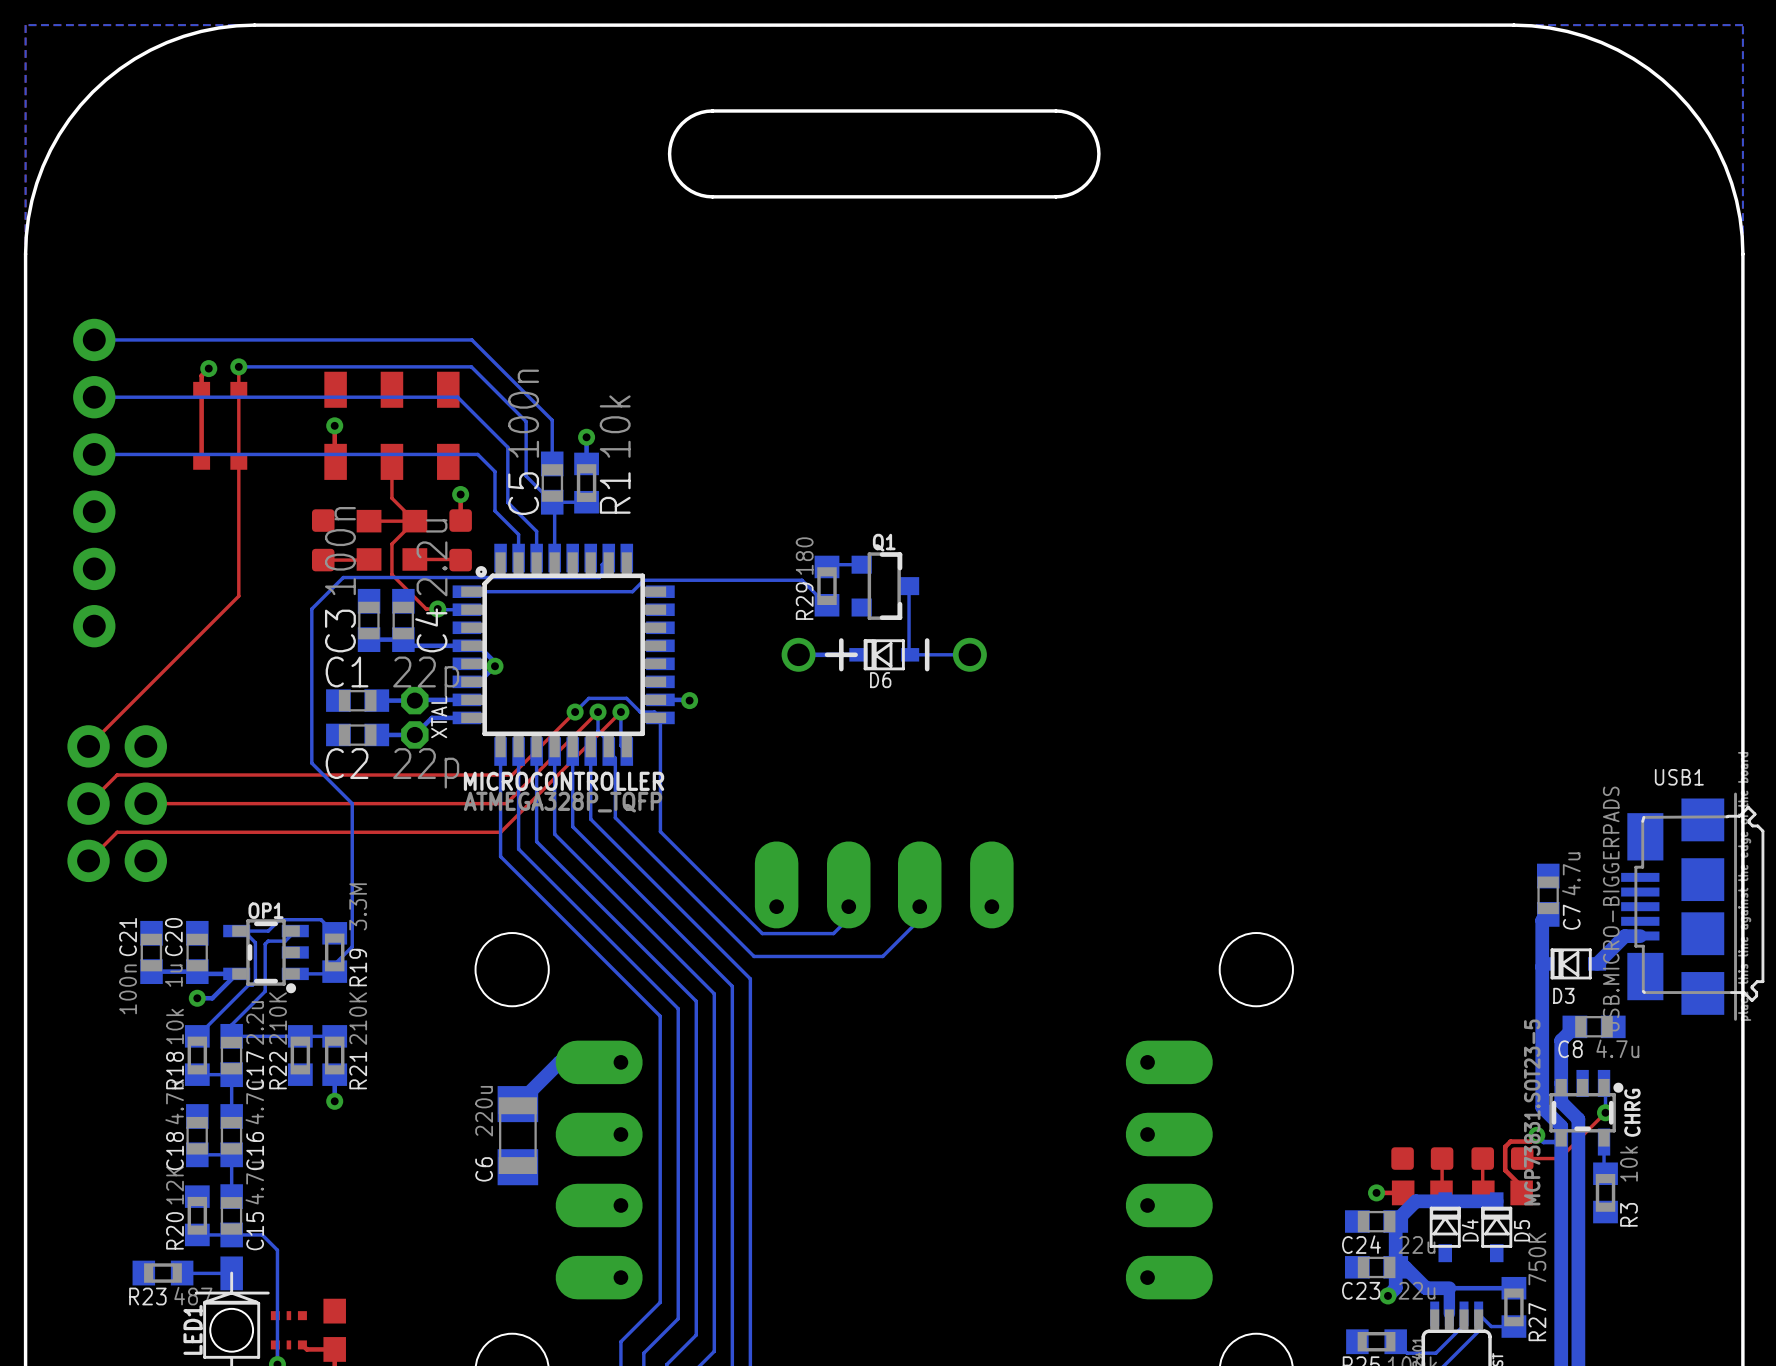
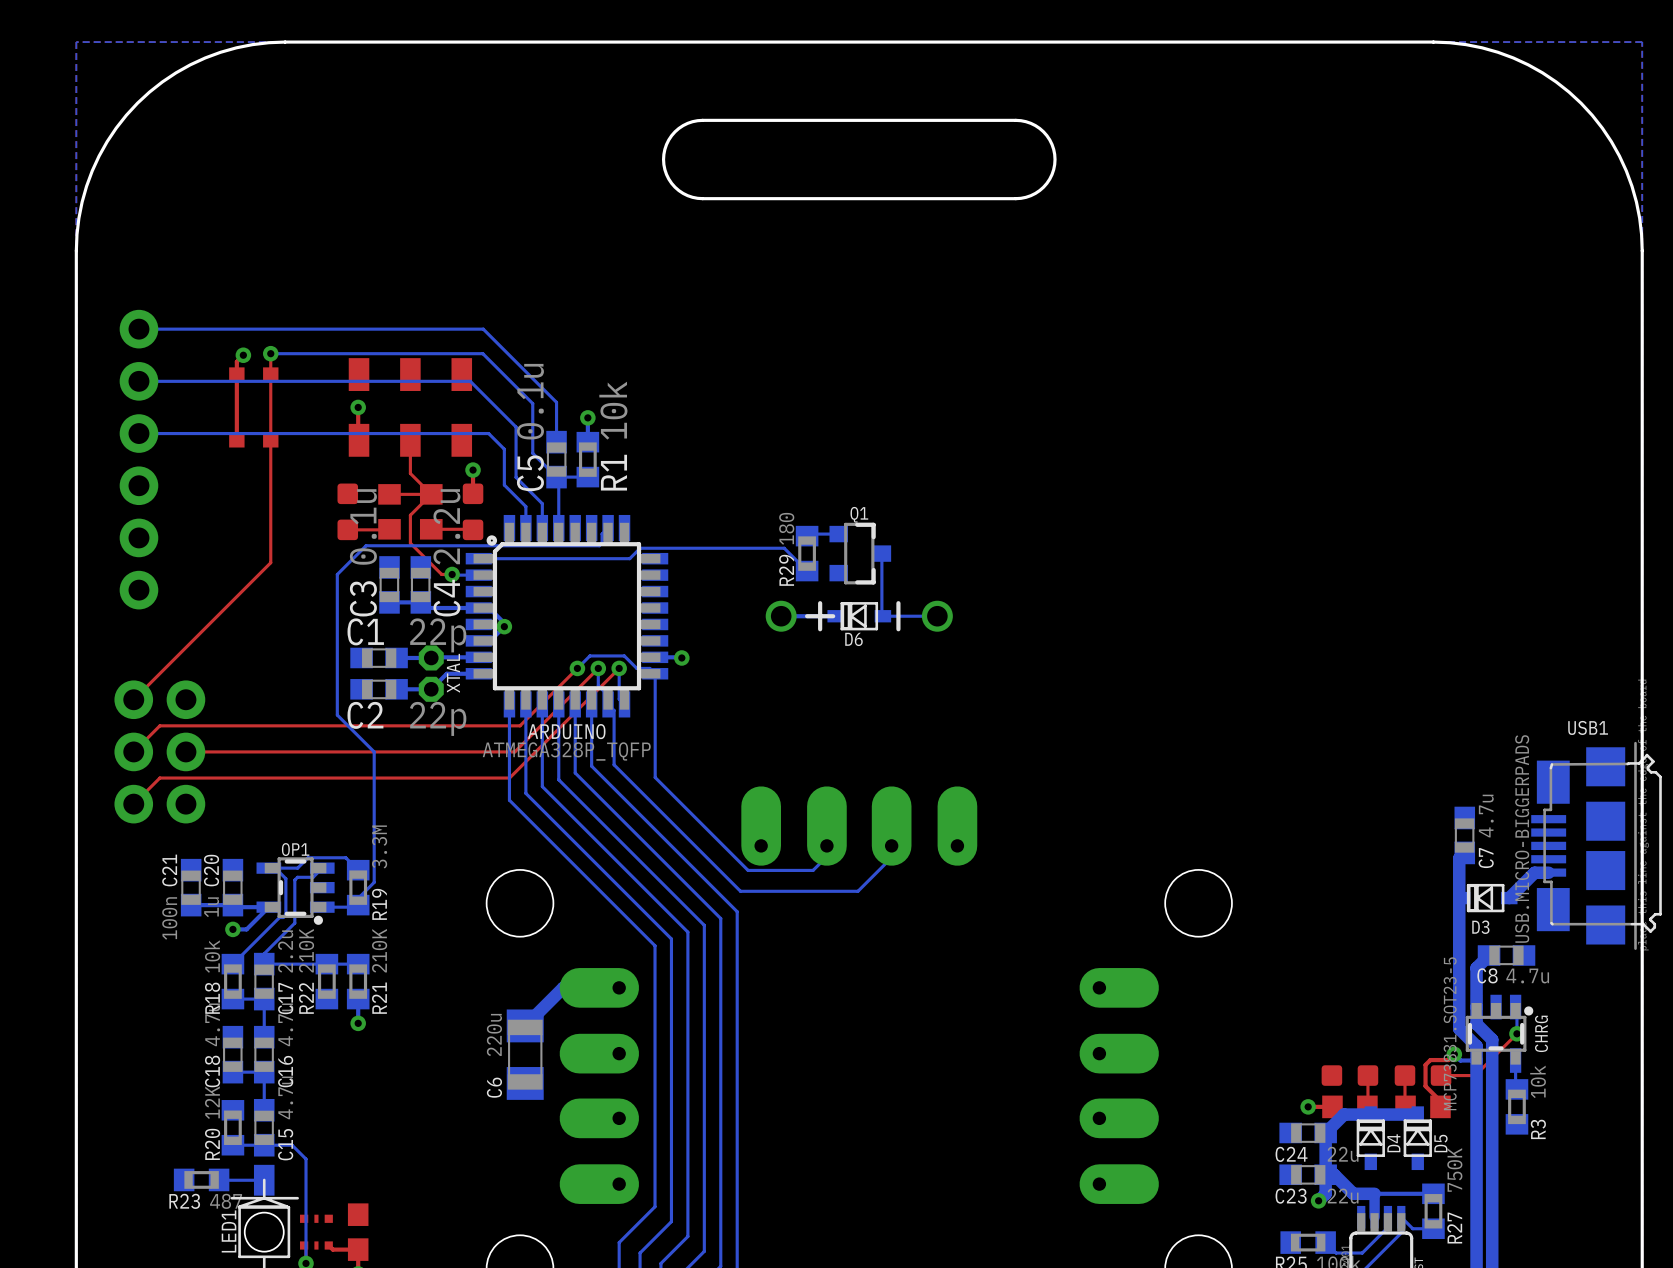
C5 value: 100n (523, 413) -> 0.1u (530, 401)
C3 value: 100n (340, 551) -> 0.1u (363, 526)
MICROCONTROLLER name: MICROCONTROLLER (564, 781) -> ARDUINO (566, 731)

